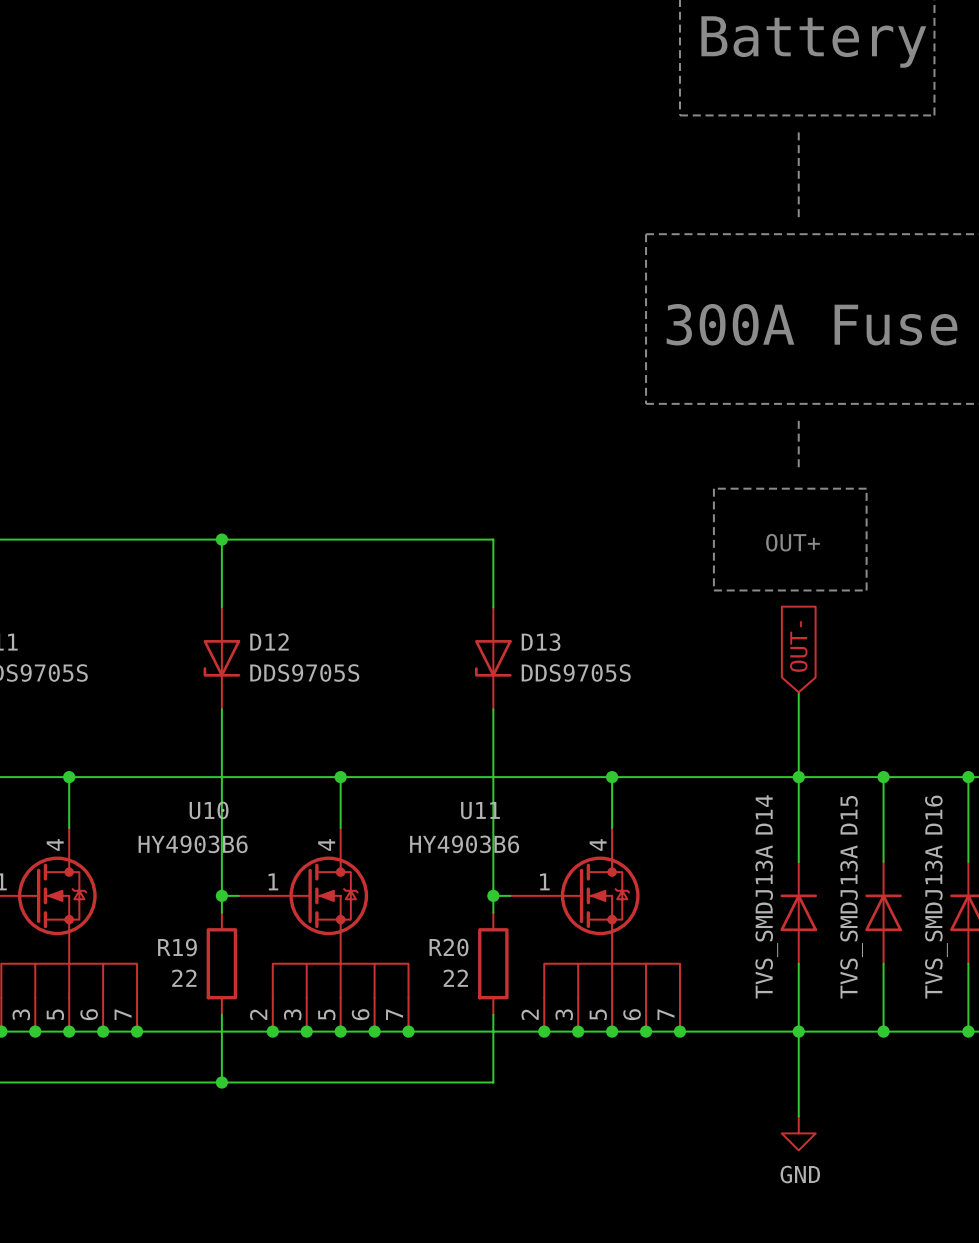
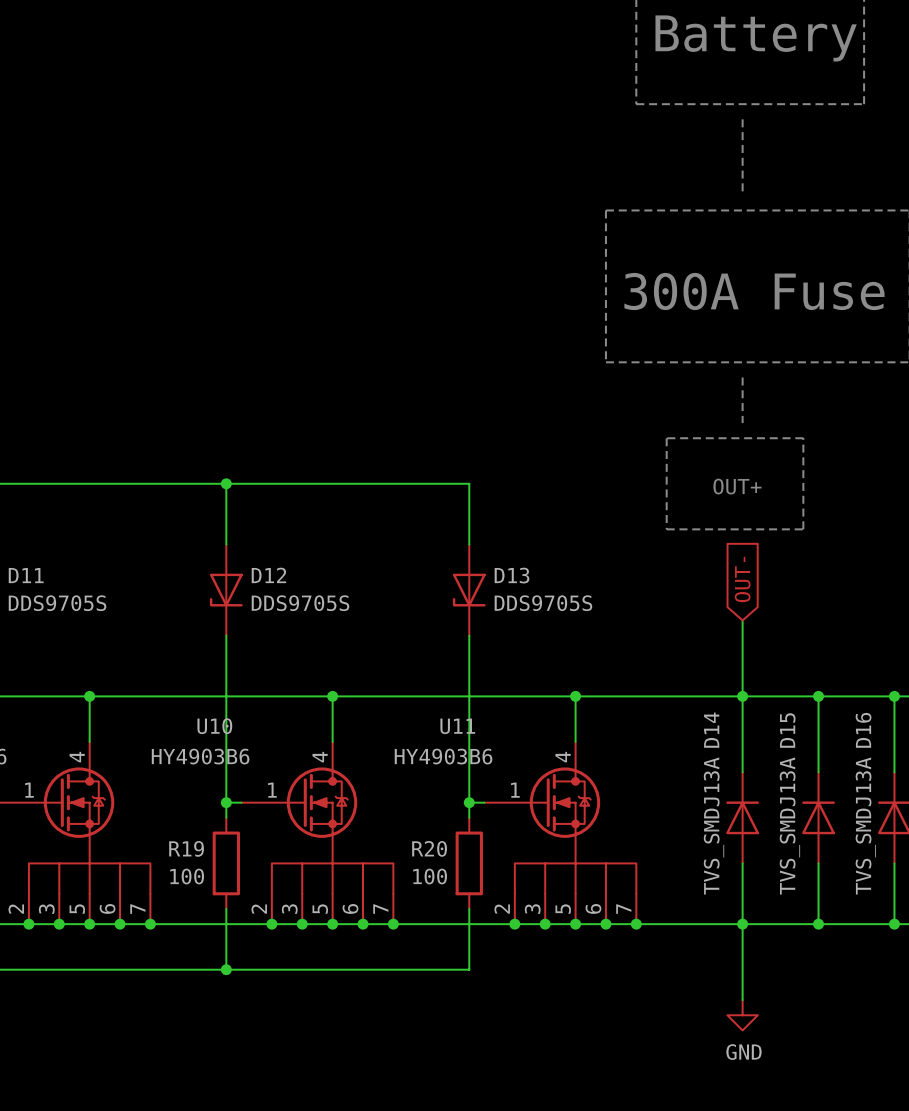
R19 value: 22 (184, 978) -> 100 (187, 876)
R20 value: 22 (455, 978) -> 100 (430, 876)

